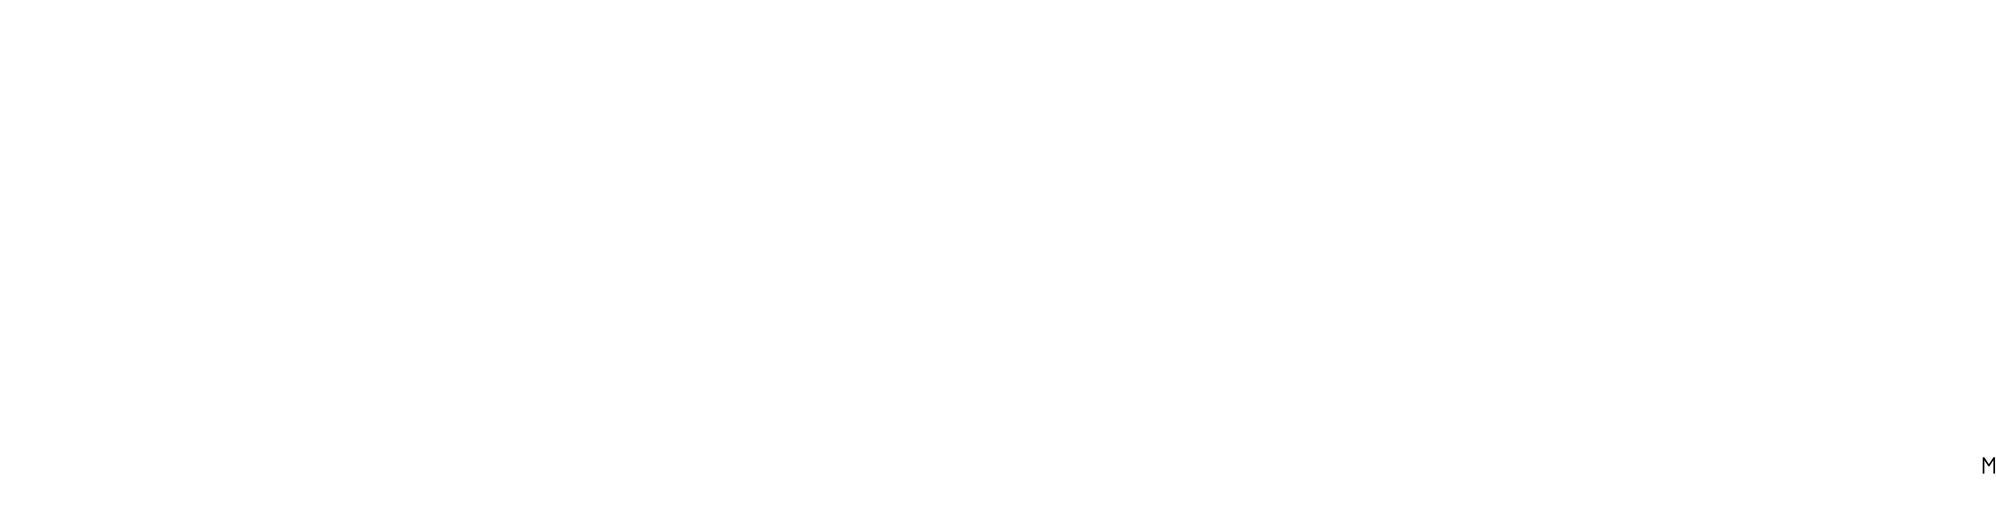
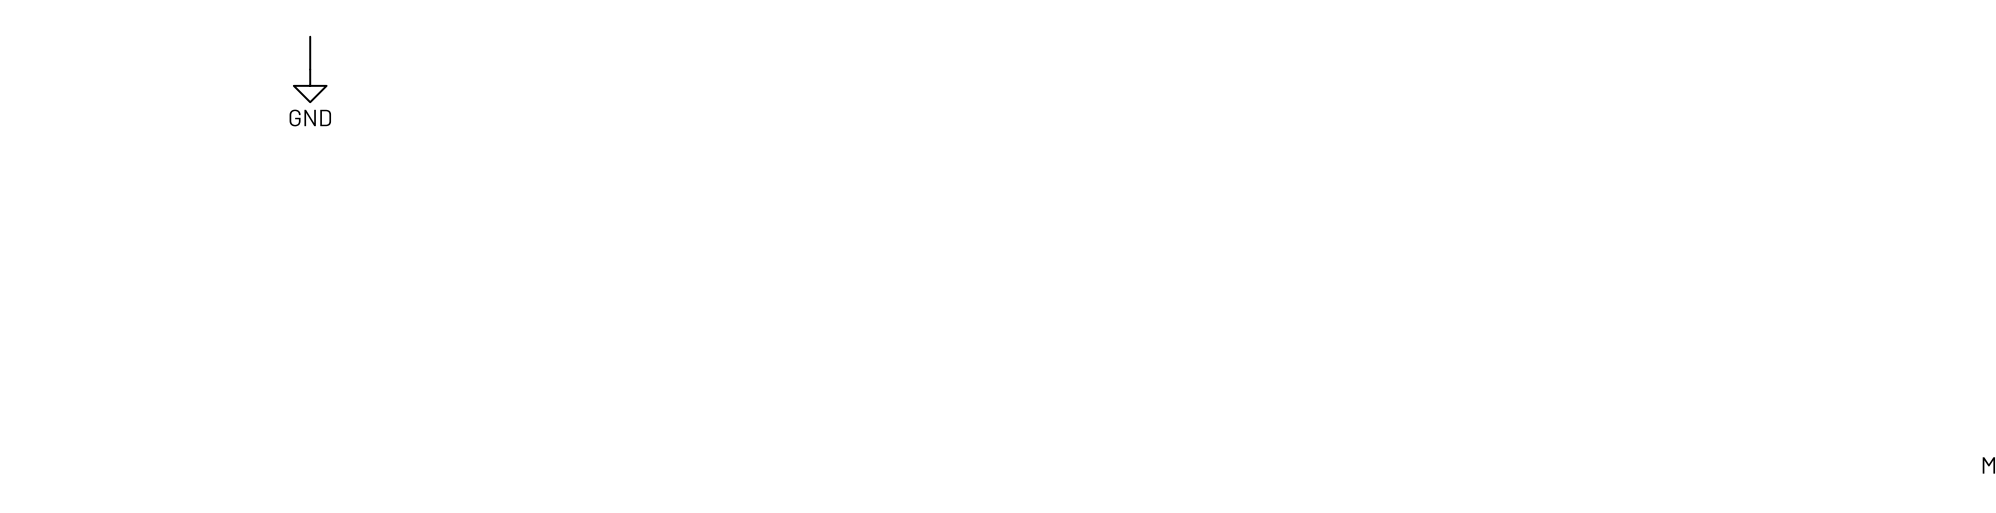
wire: none -> (310, 36) (310, 69)
power symbol: none -> GND (310, 85)

